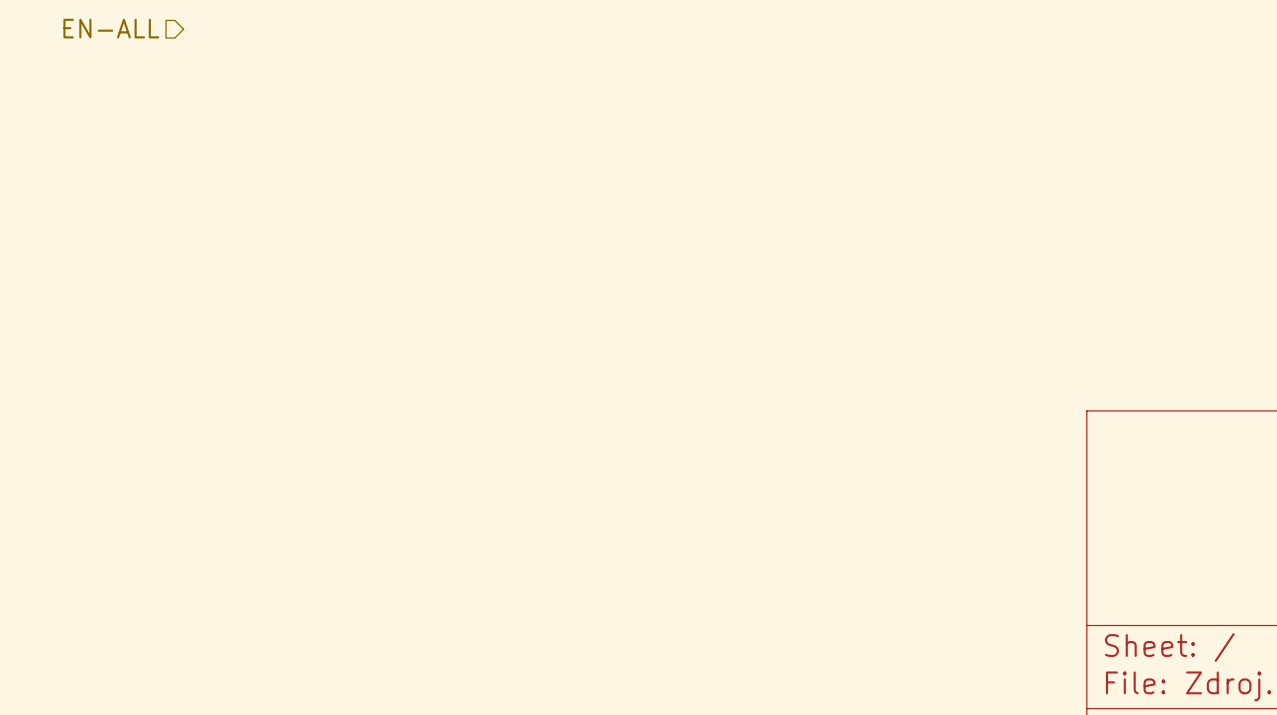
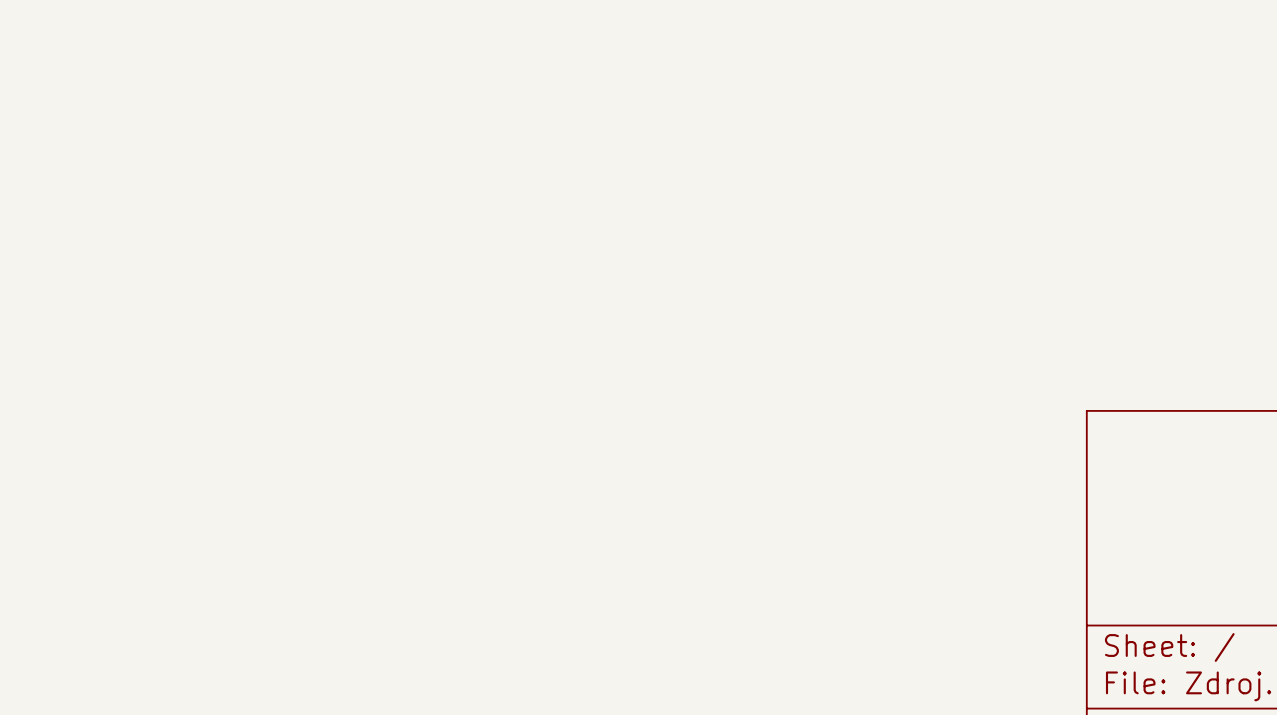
hierarchical label: EN-ALL (111, 28) -> none

